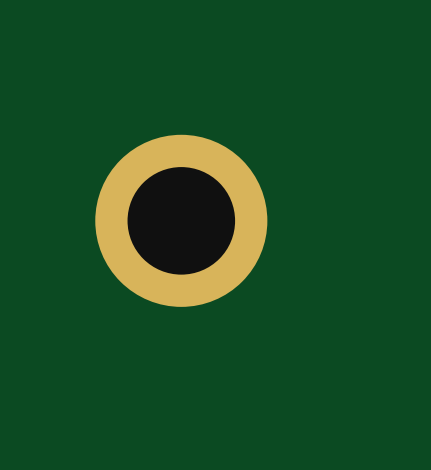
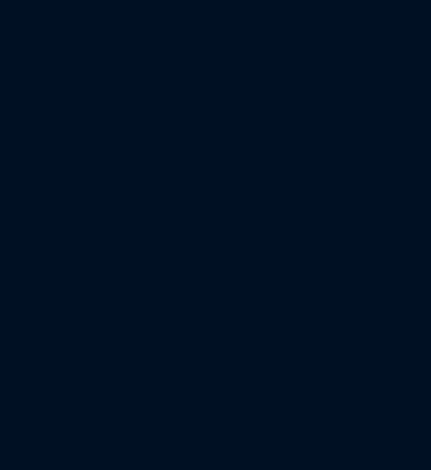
part: (181, 220) -> none

